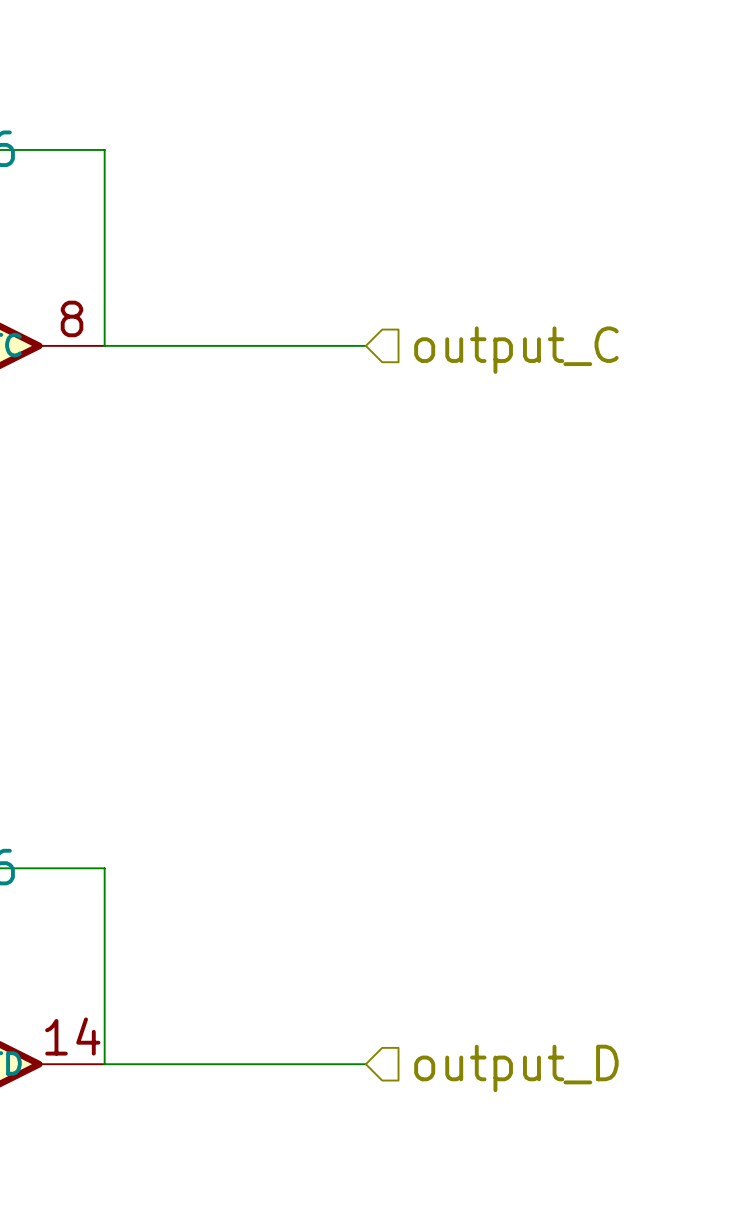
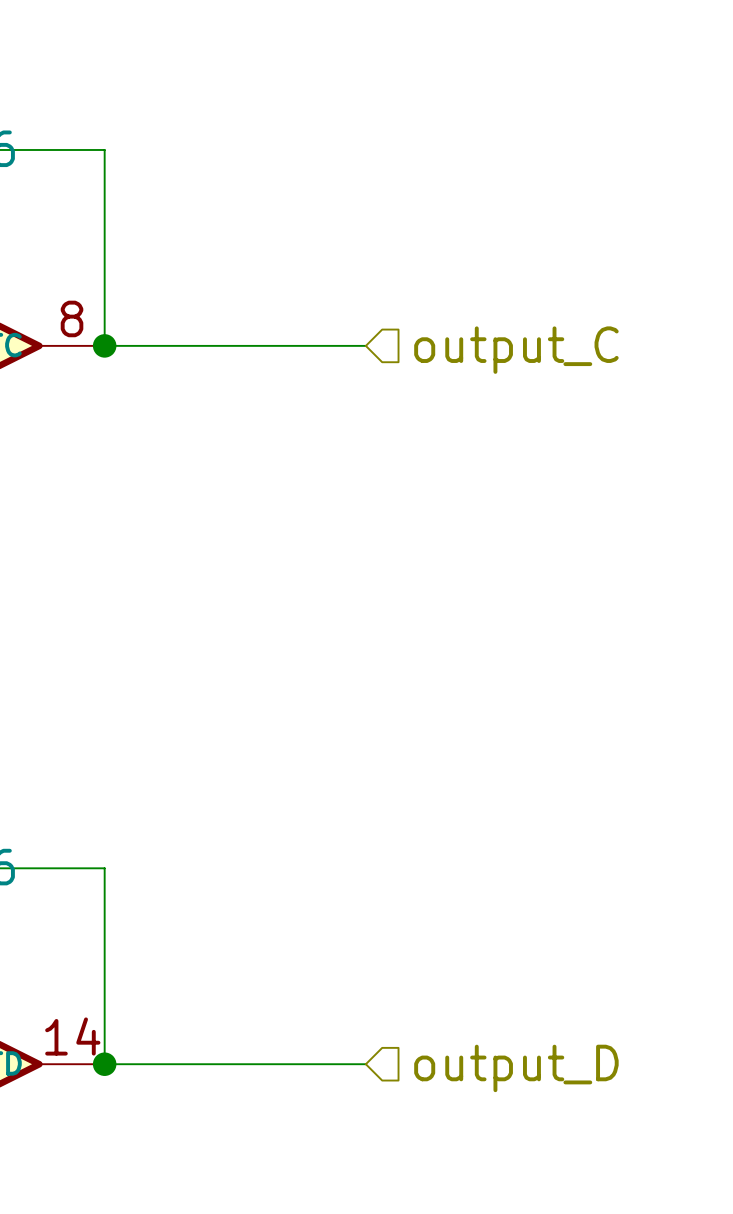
junction: none -> (104, 345)
junction: none -> (104, 1064)

